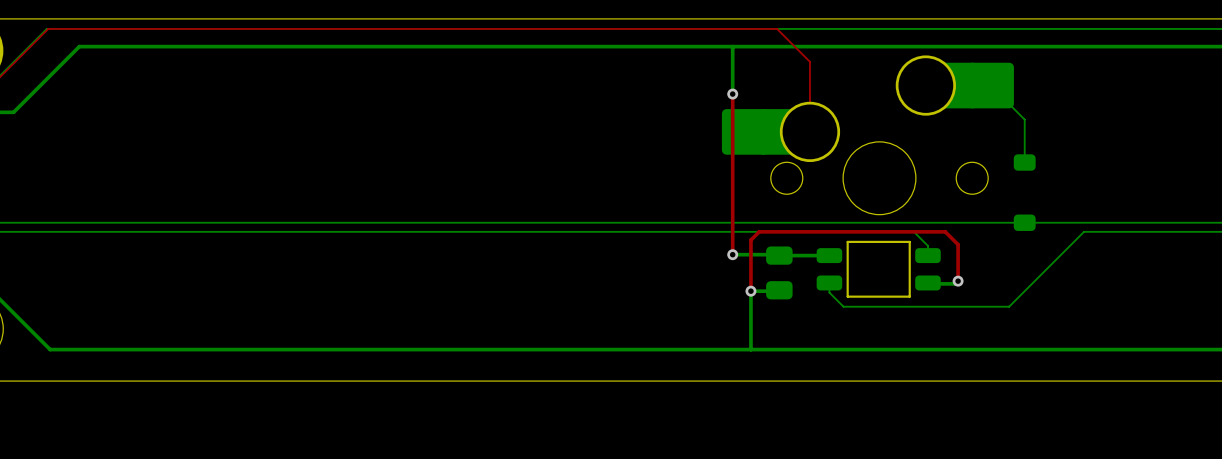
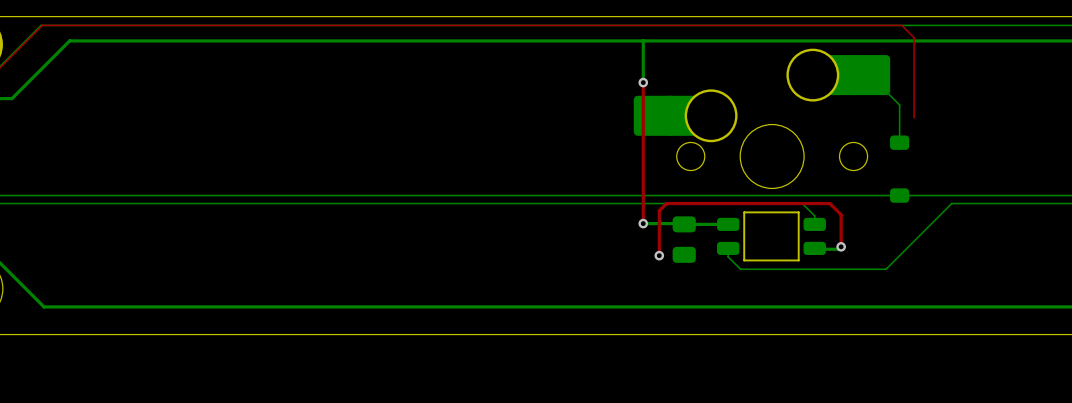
top track: (777, 28) (809, 61) (809, 131) -> (682, 25) (901, 25) (914, 37) (914, 117)
bottom track: (779, 290) (750, 291) (750, 349) -> none

